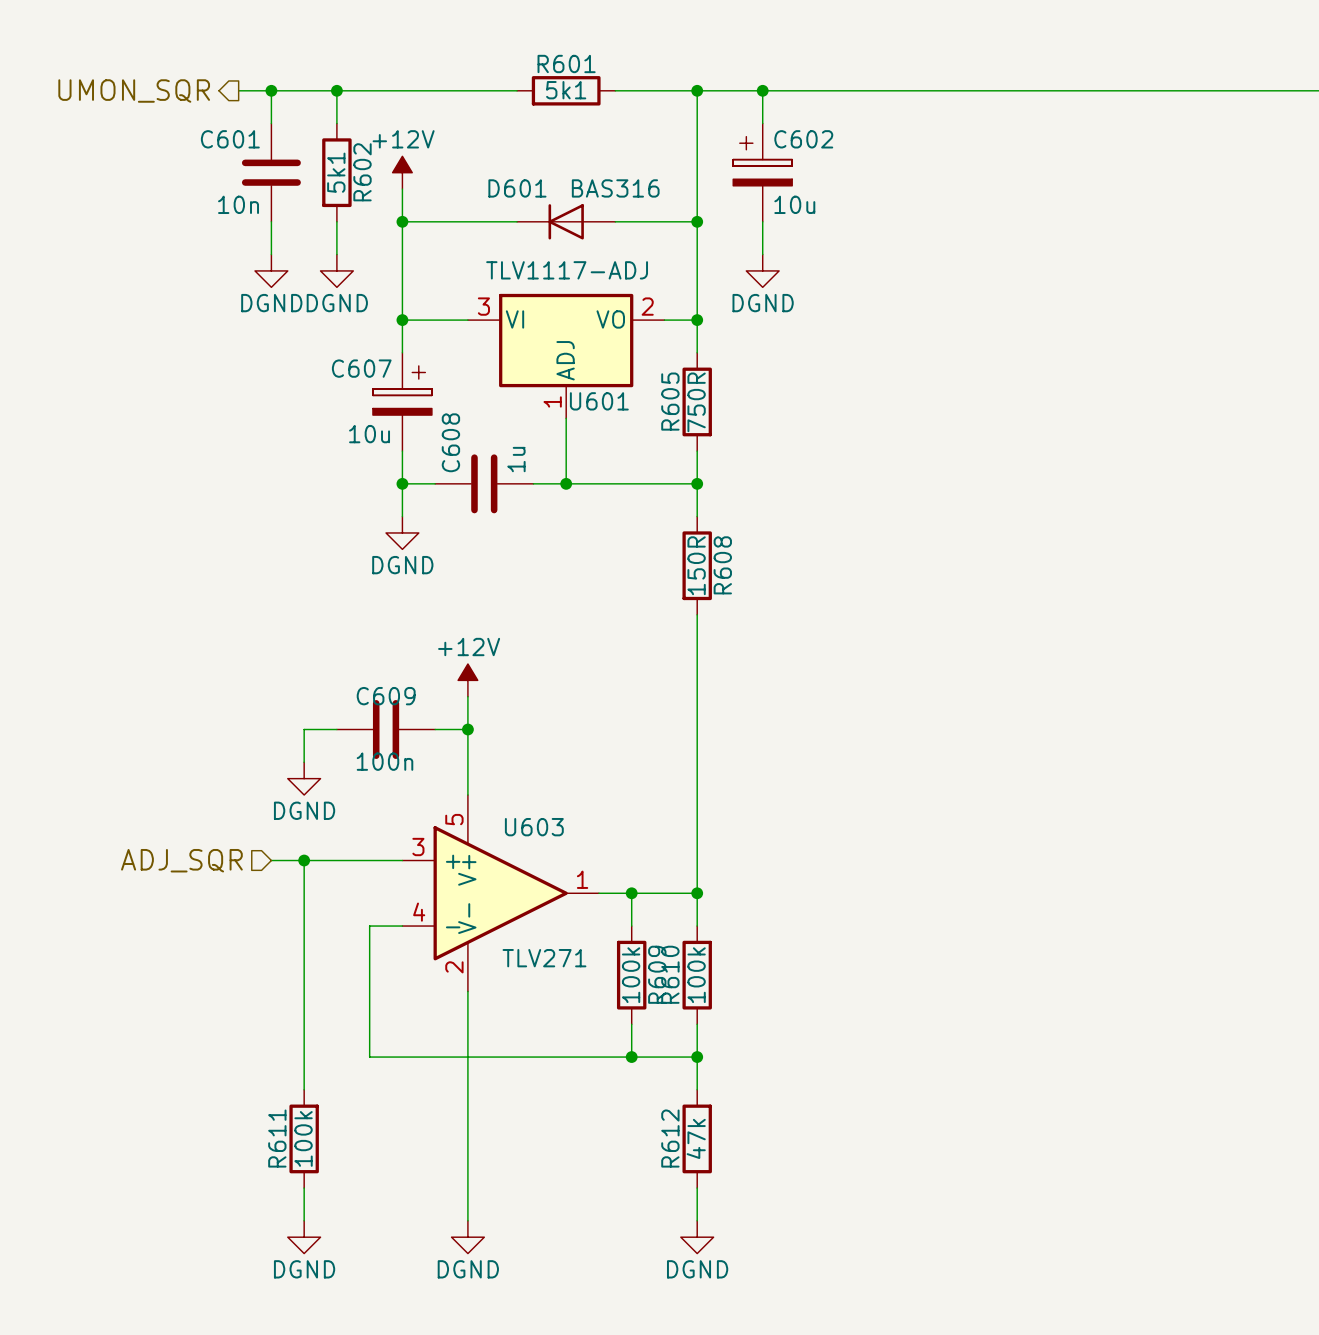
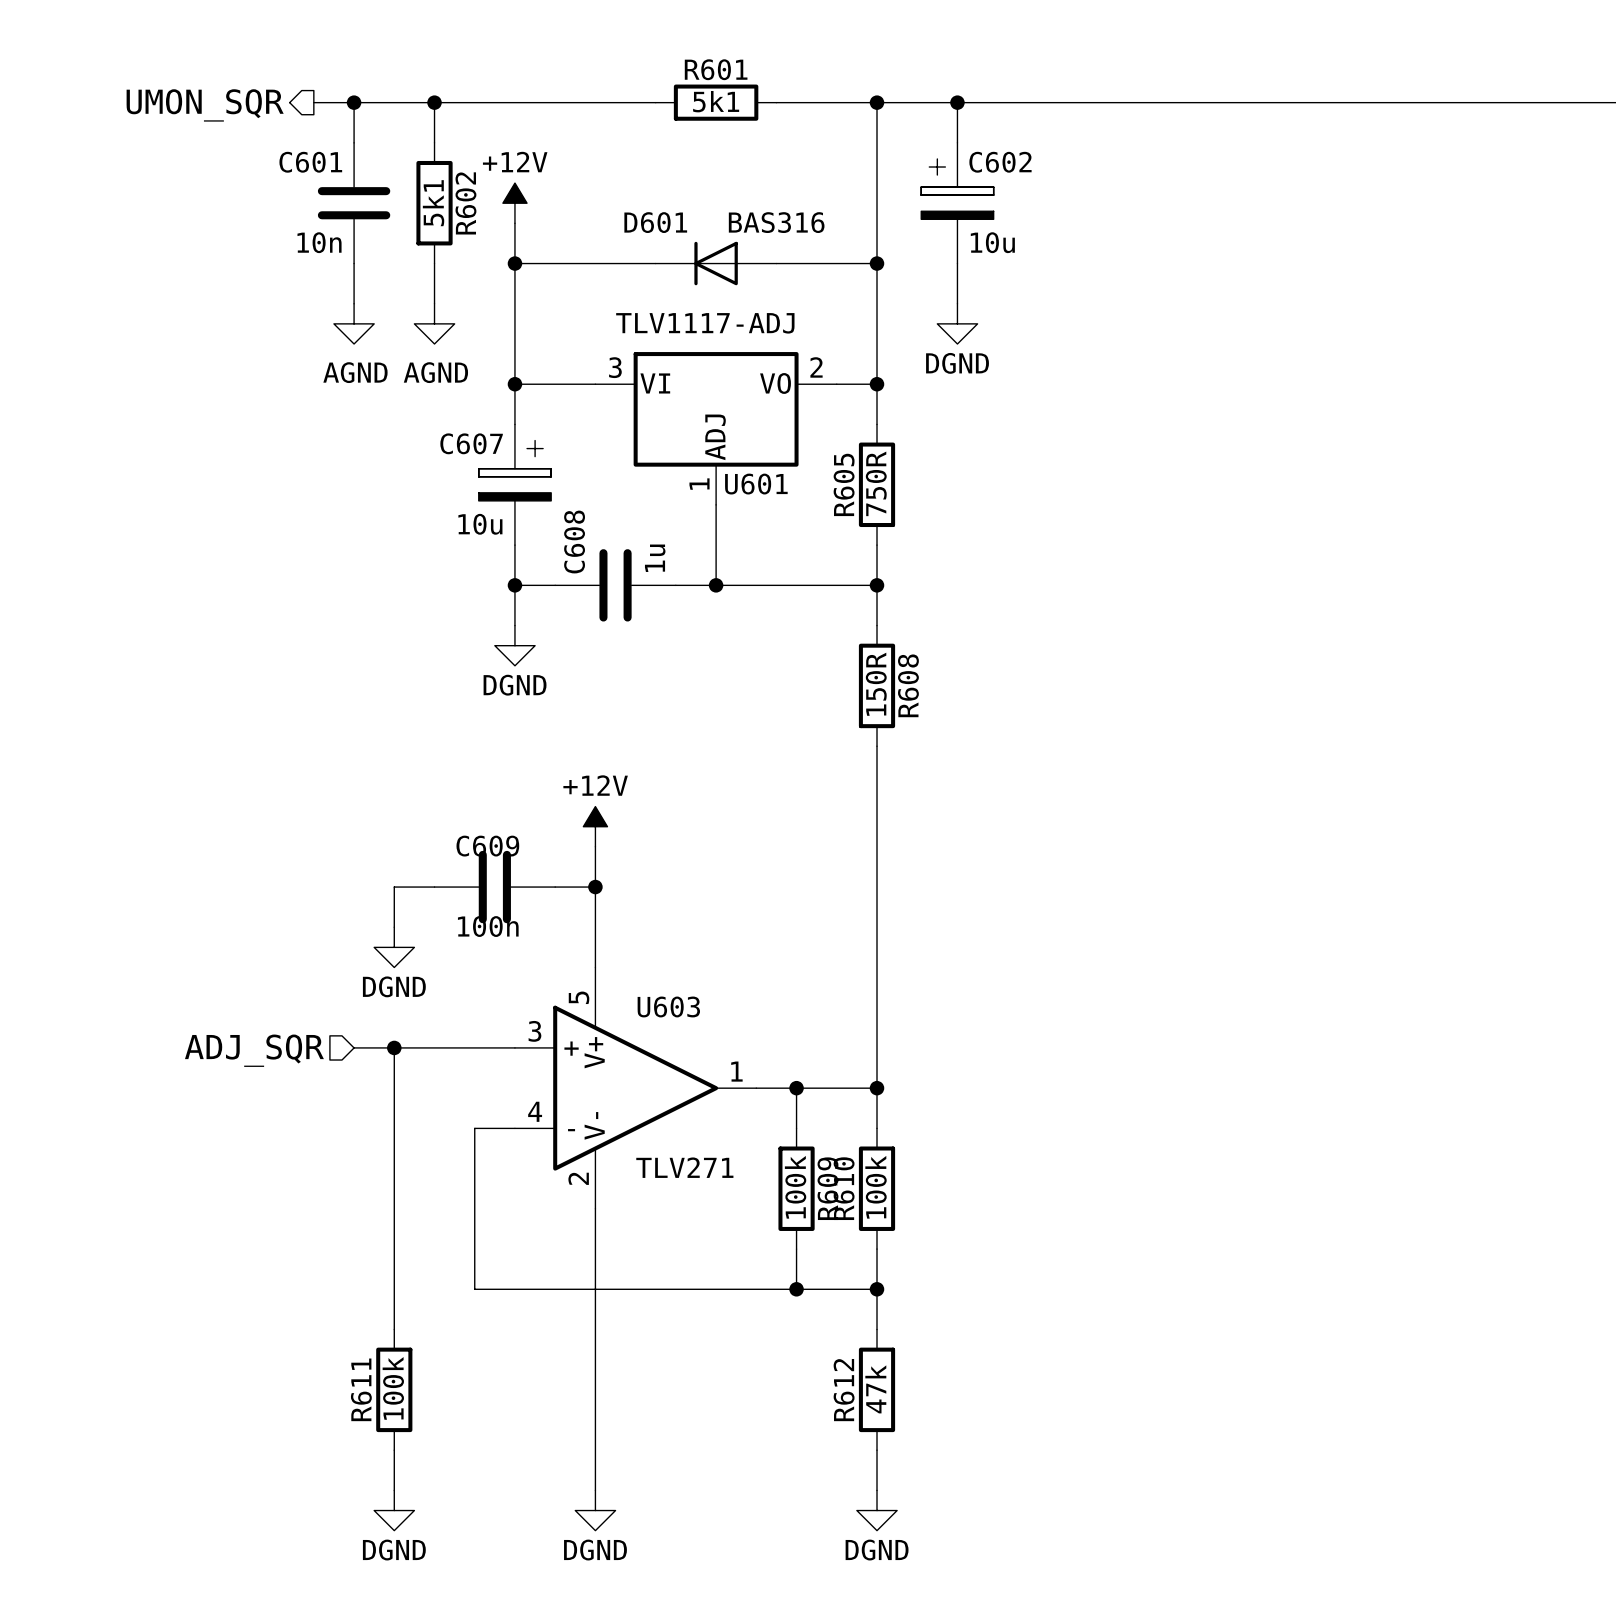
power symbol: DGND (271, 270) -> AGND (354, 323)
power symbol: DGND (336, 270) -> AGND (434, 323)

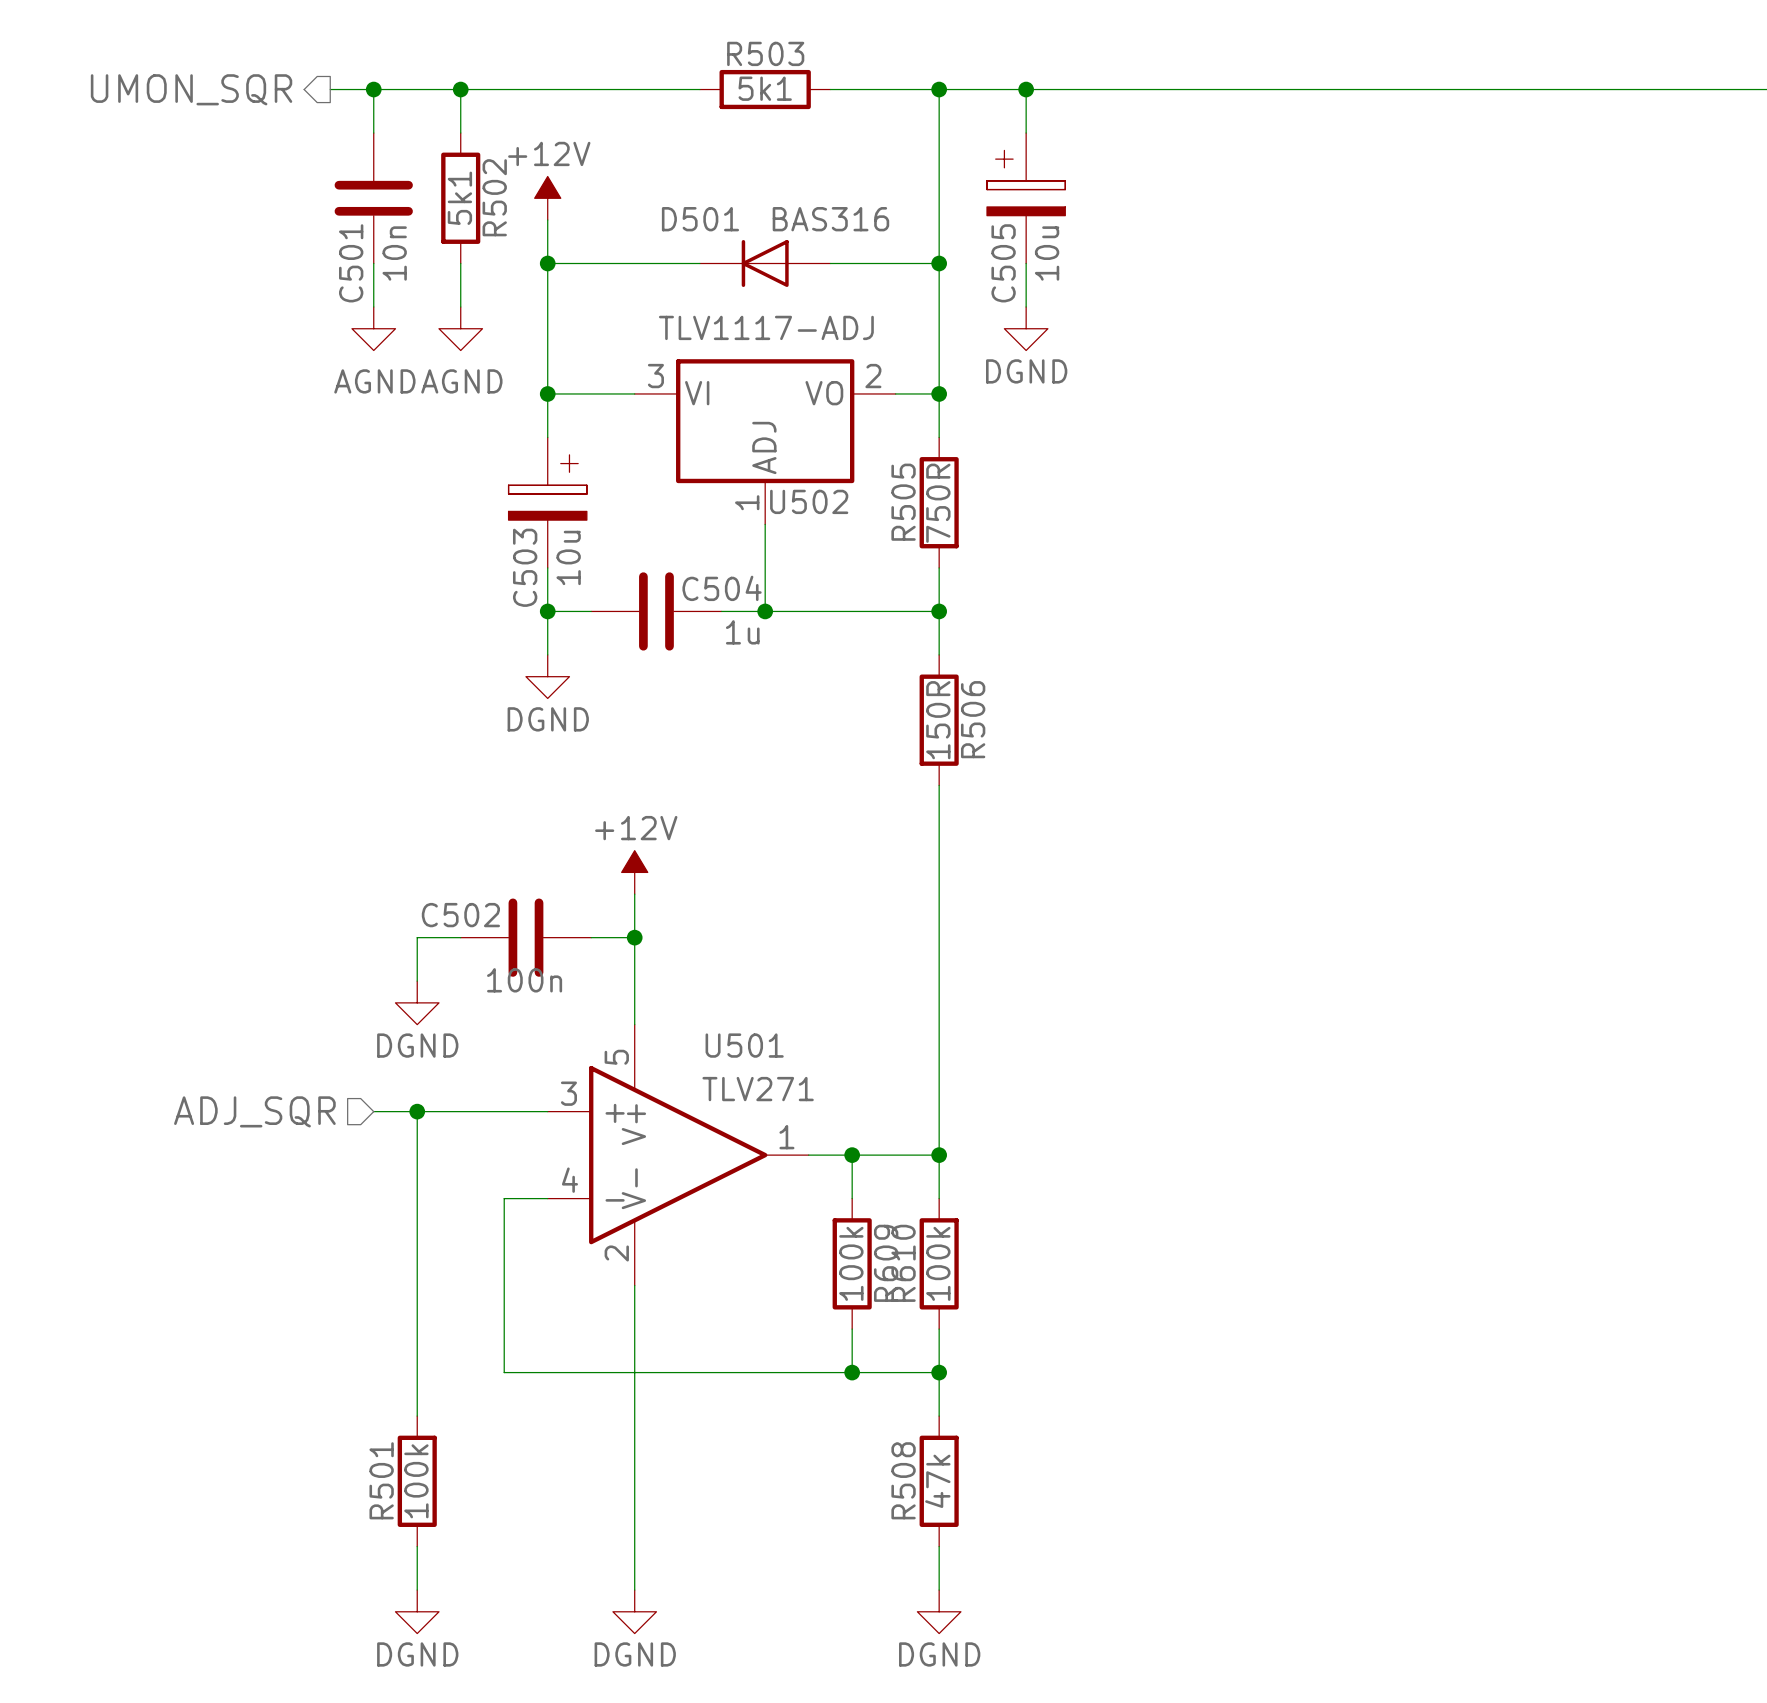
R601 name: R601 (716, 69) -> R503 (765, 53)
C601 name: C601 (310, 162) -> C501 (351, 263)
C602 name: C602 (1000, 162) -> C505 (1003, 263)
R602 name: R602 (465, 203) -> R502 (494, 197)
D601 name: D601 (655, 222) -> D501 (700, 219)
C601 value rotation: 0° (319, 242) -> 90° counterclockwise (394, 253)
C602 value rotation: 0° (992, 242) -> 90° counterclockwise (1047, 253)
C607 name: C607 (471, 443) -> C503 (525, 567)
U601 name: U601 (756, 484) -> U502 (809, 501)
R605 name: R605 (844, 484) -> R505 (903, 502)
C607 value rotation: 0° (480, 524) -> 90° counterclockwise (568, 557)
C608 name: C608 (574, 542) -> C504 (722, 588)
C608 value rotation: 0° (655, 558) -> 90° clockwise (742, 632)
C608 value position: 1u (655, 558) -> 1u (742, 632)
R608 name: R608 (908, 685) -> R506 (973, 719)
C609 name: C609 (487, 846) -> C502 (460, 915)
U603 name: U603 (668, 1006) -> U501 (744, 1045)
U603 value position: TLV271 (684, 1167) -> TLV271 (758, 1089)
R611 name: R611 (361, 1389) -> R501 (381, 1480)
R612 name: R612 (844, 1390) -> R508 (903, 1480)

